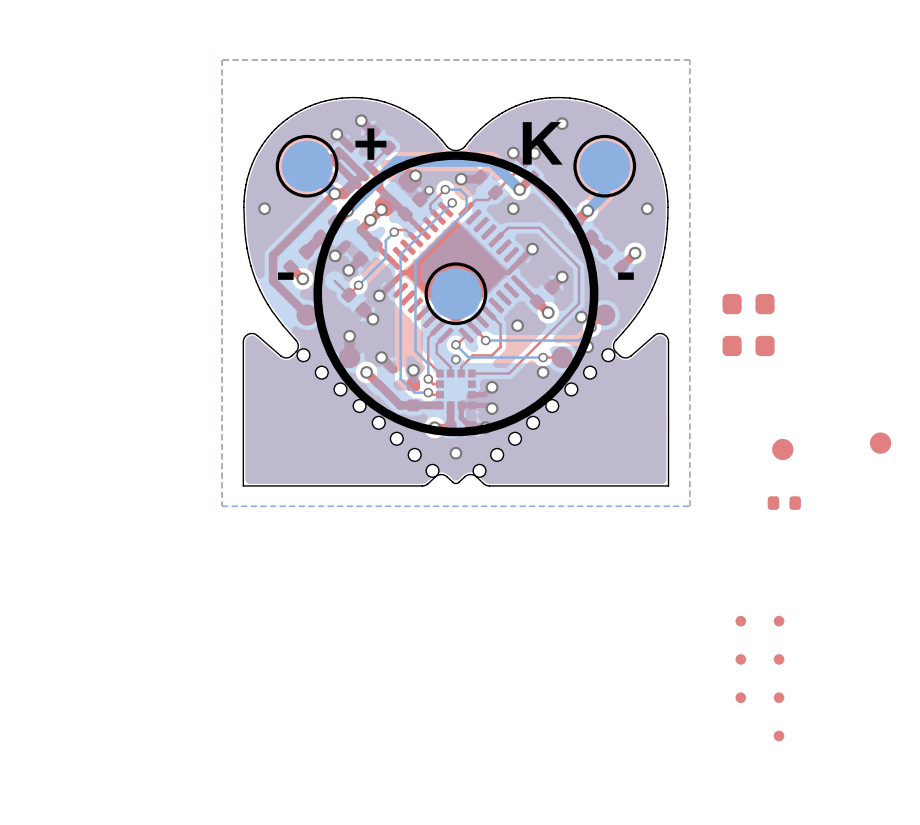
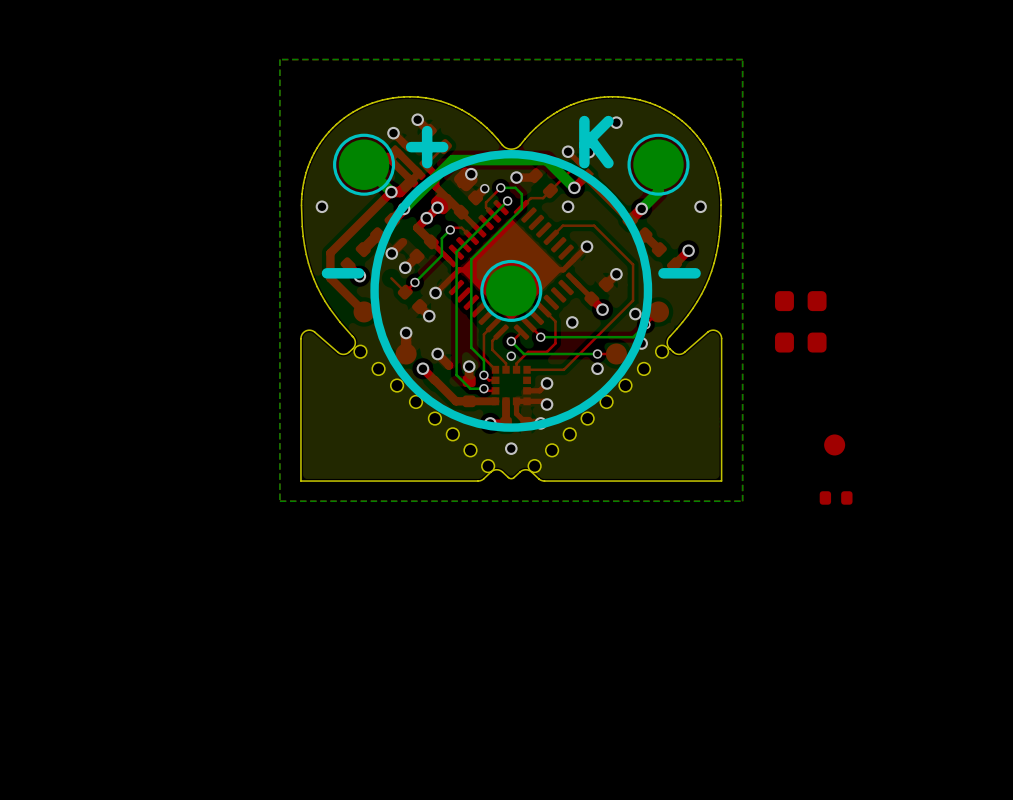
part: (880, 443) -> none
part: (740, 621) -> none
part: (779, 621) -> none
part: (740, 659) -> none
part: (779, 659) -> none
part: (740, 697) -> none
part: (779, 697) -> none
part: (779, 735) -> none

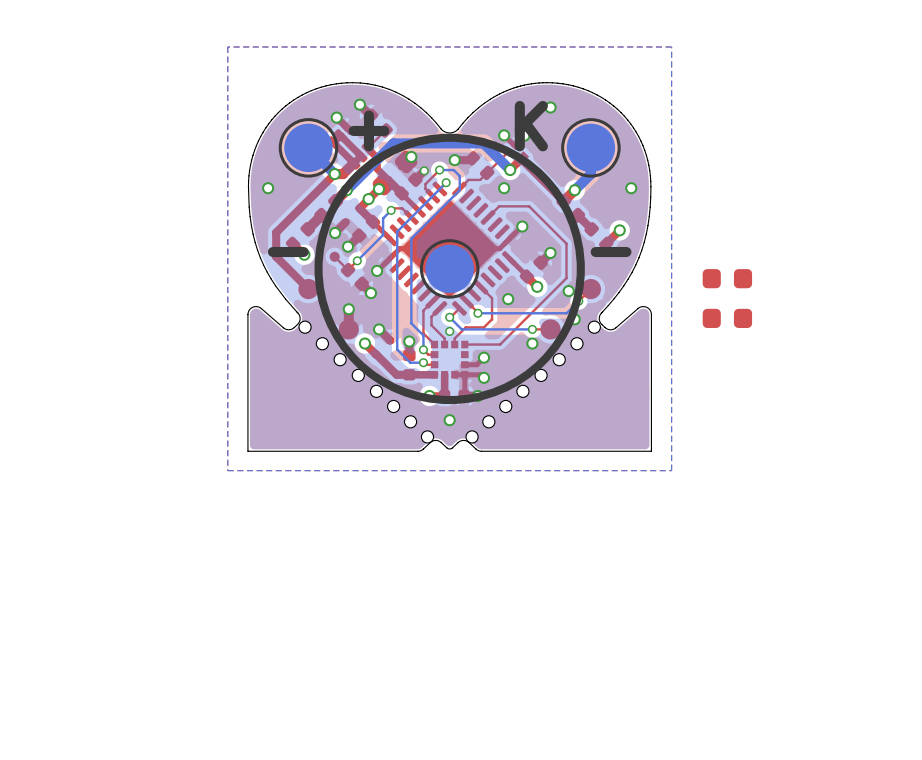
part: none -> (334, 256)
top track: (516, 401) (516, 413) (526, 423) -> none
top track: none -> (464, 374) (464, 395)
part: (834, 444) -> none
part: (836, 497) -> none

